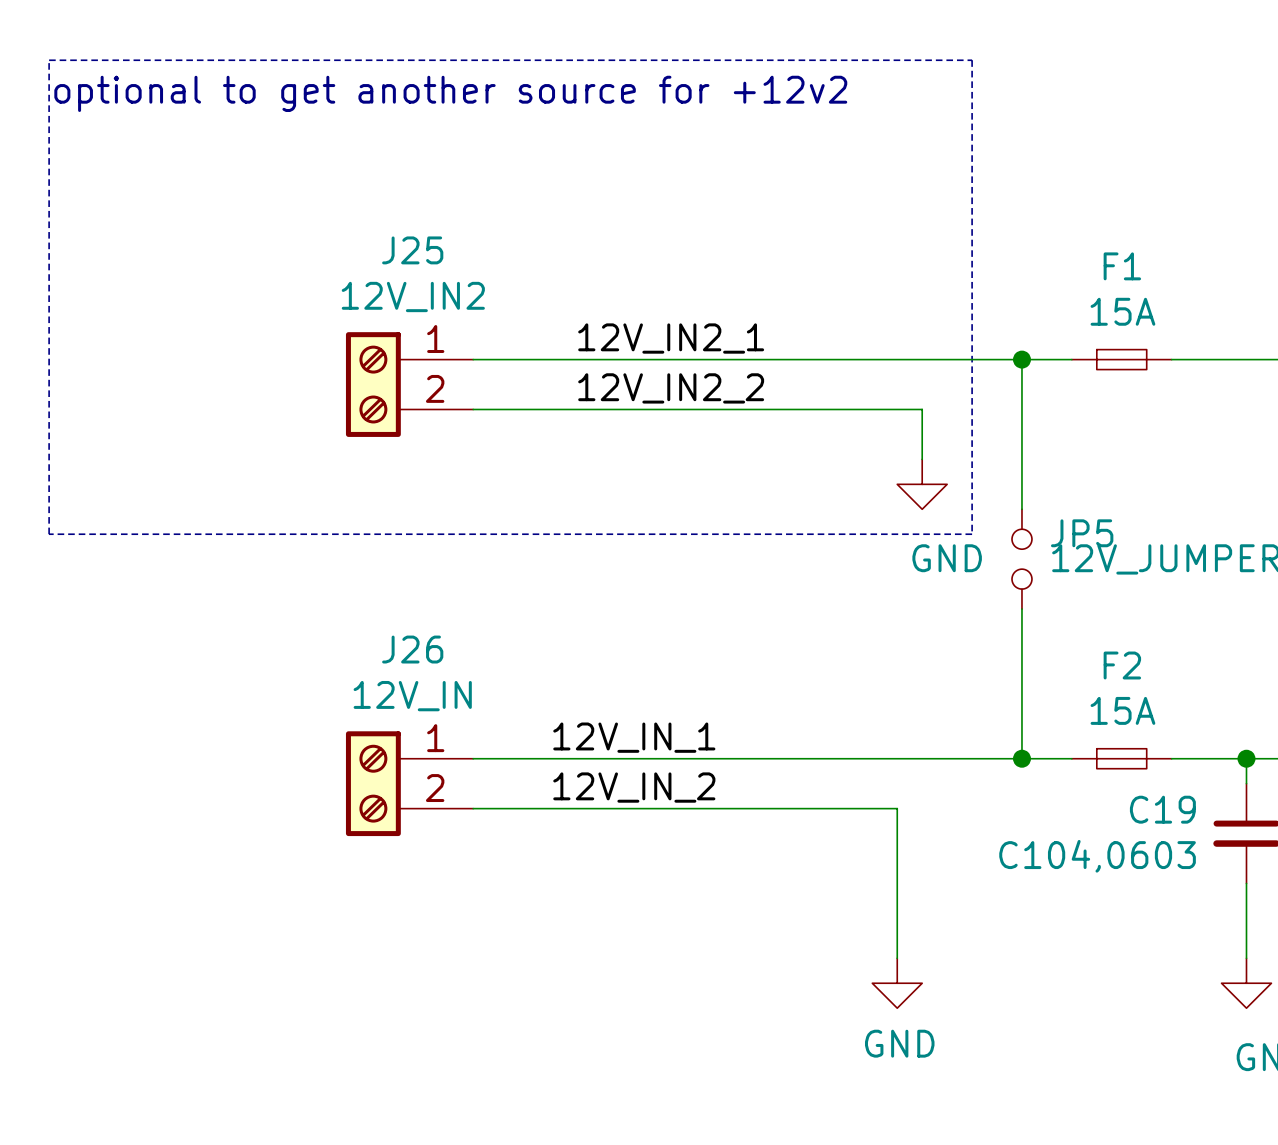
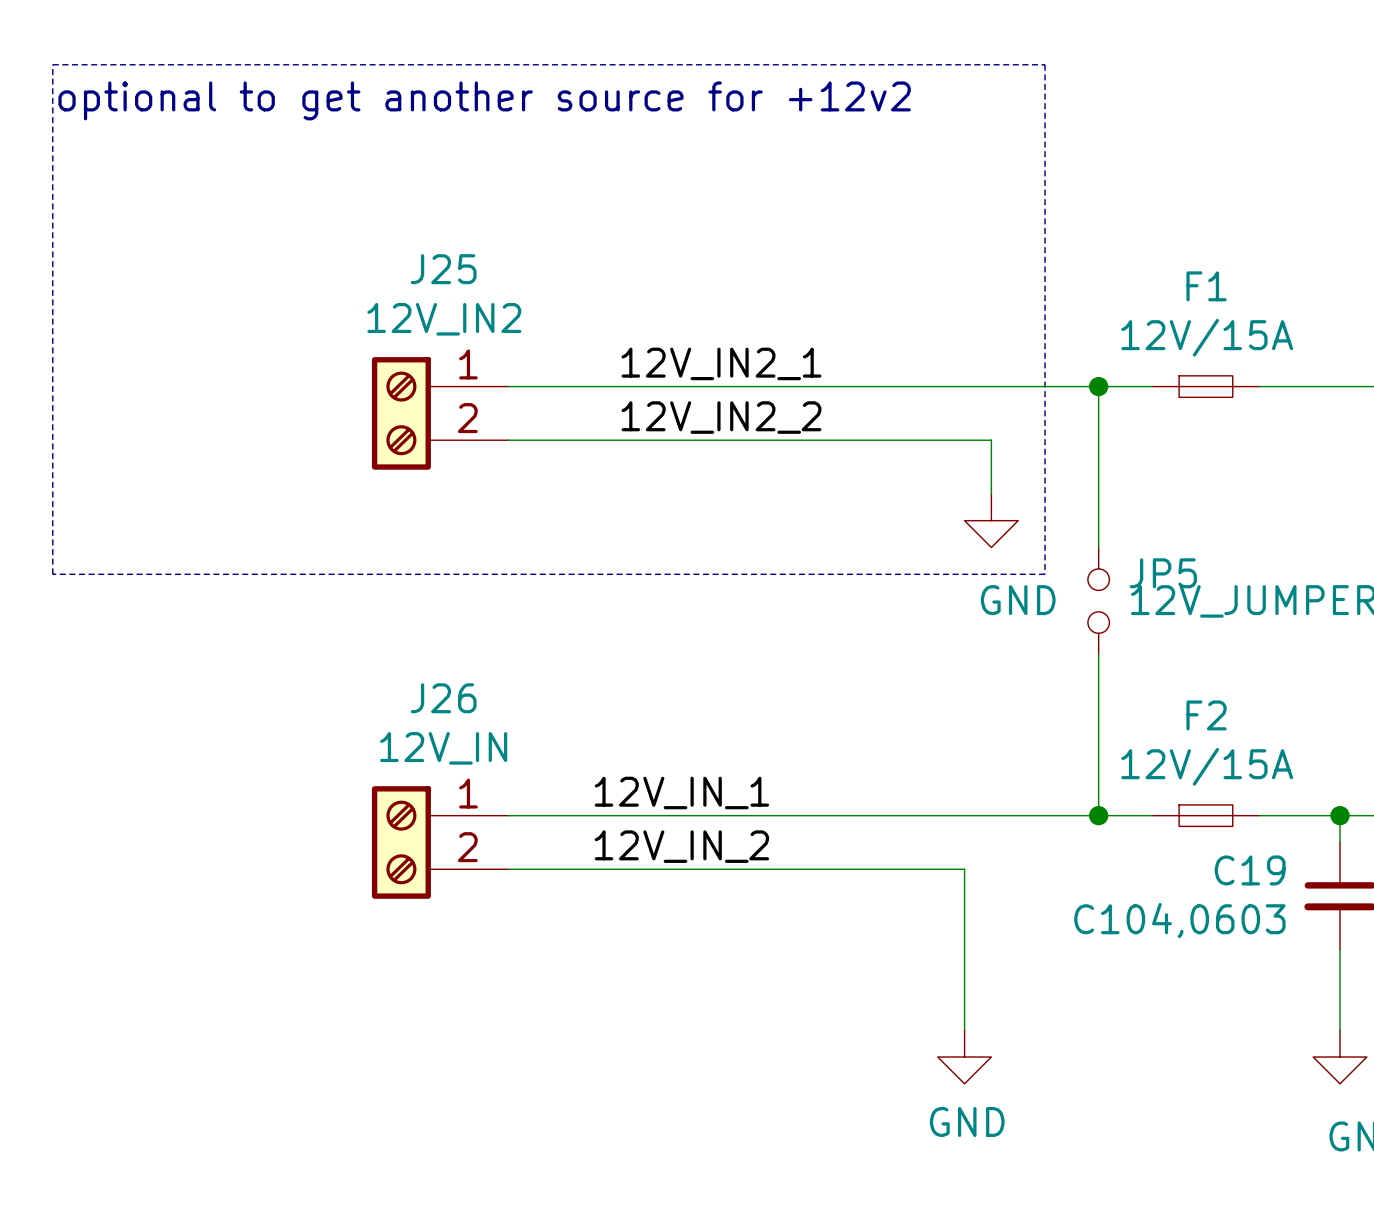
F1 value: 15A (1122, 311) -> 12V/15A (1207, 337)
F2 value: 15A (1122, 710) -> 12V/15A (1207, 766)

